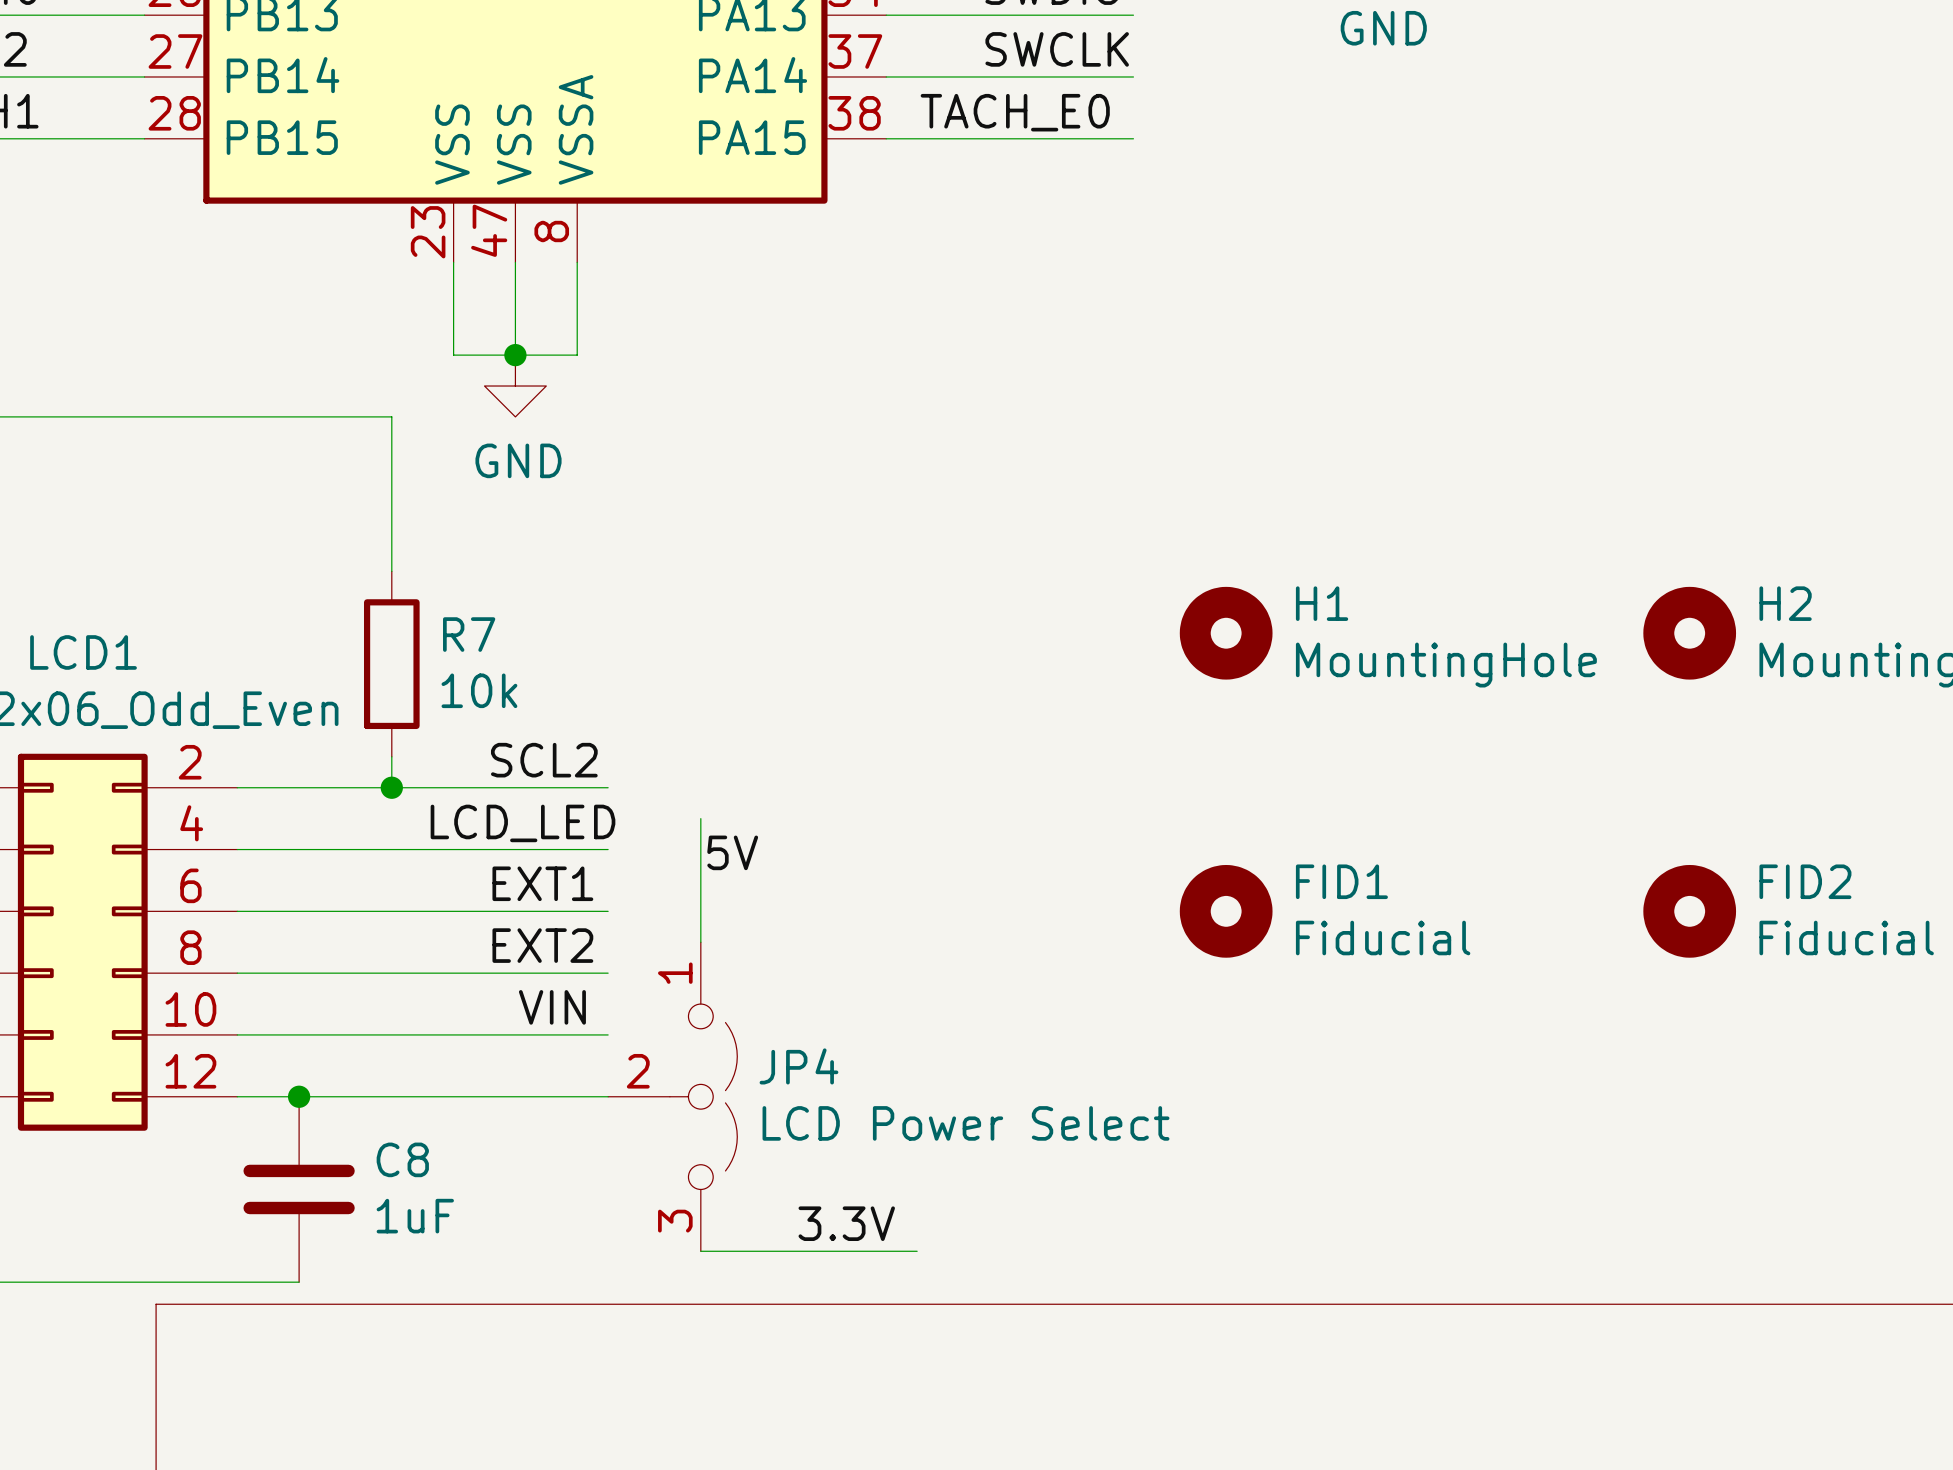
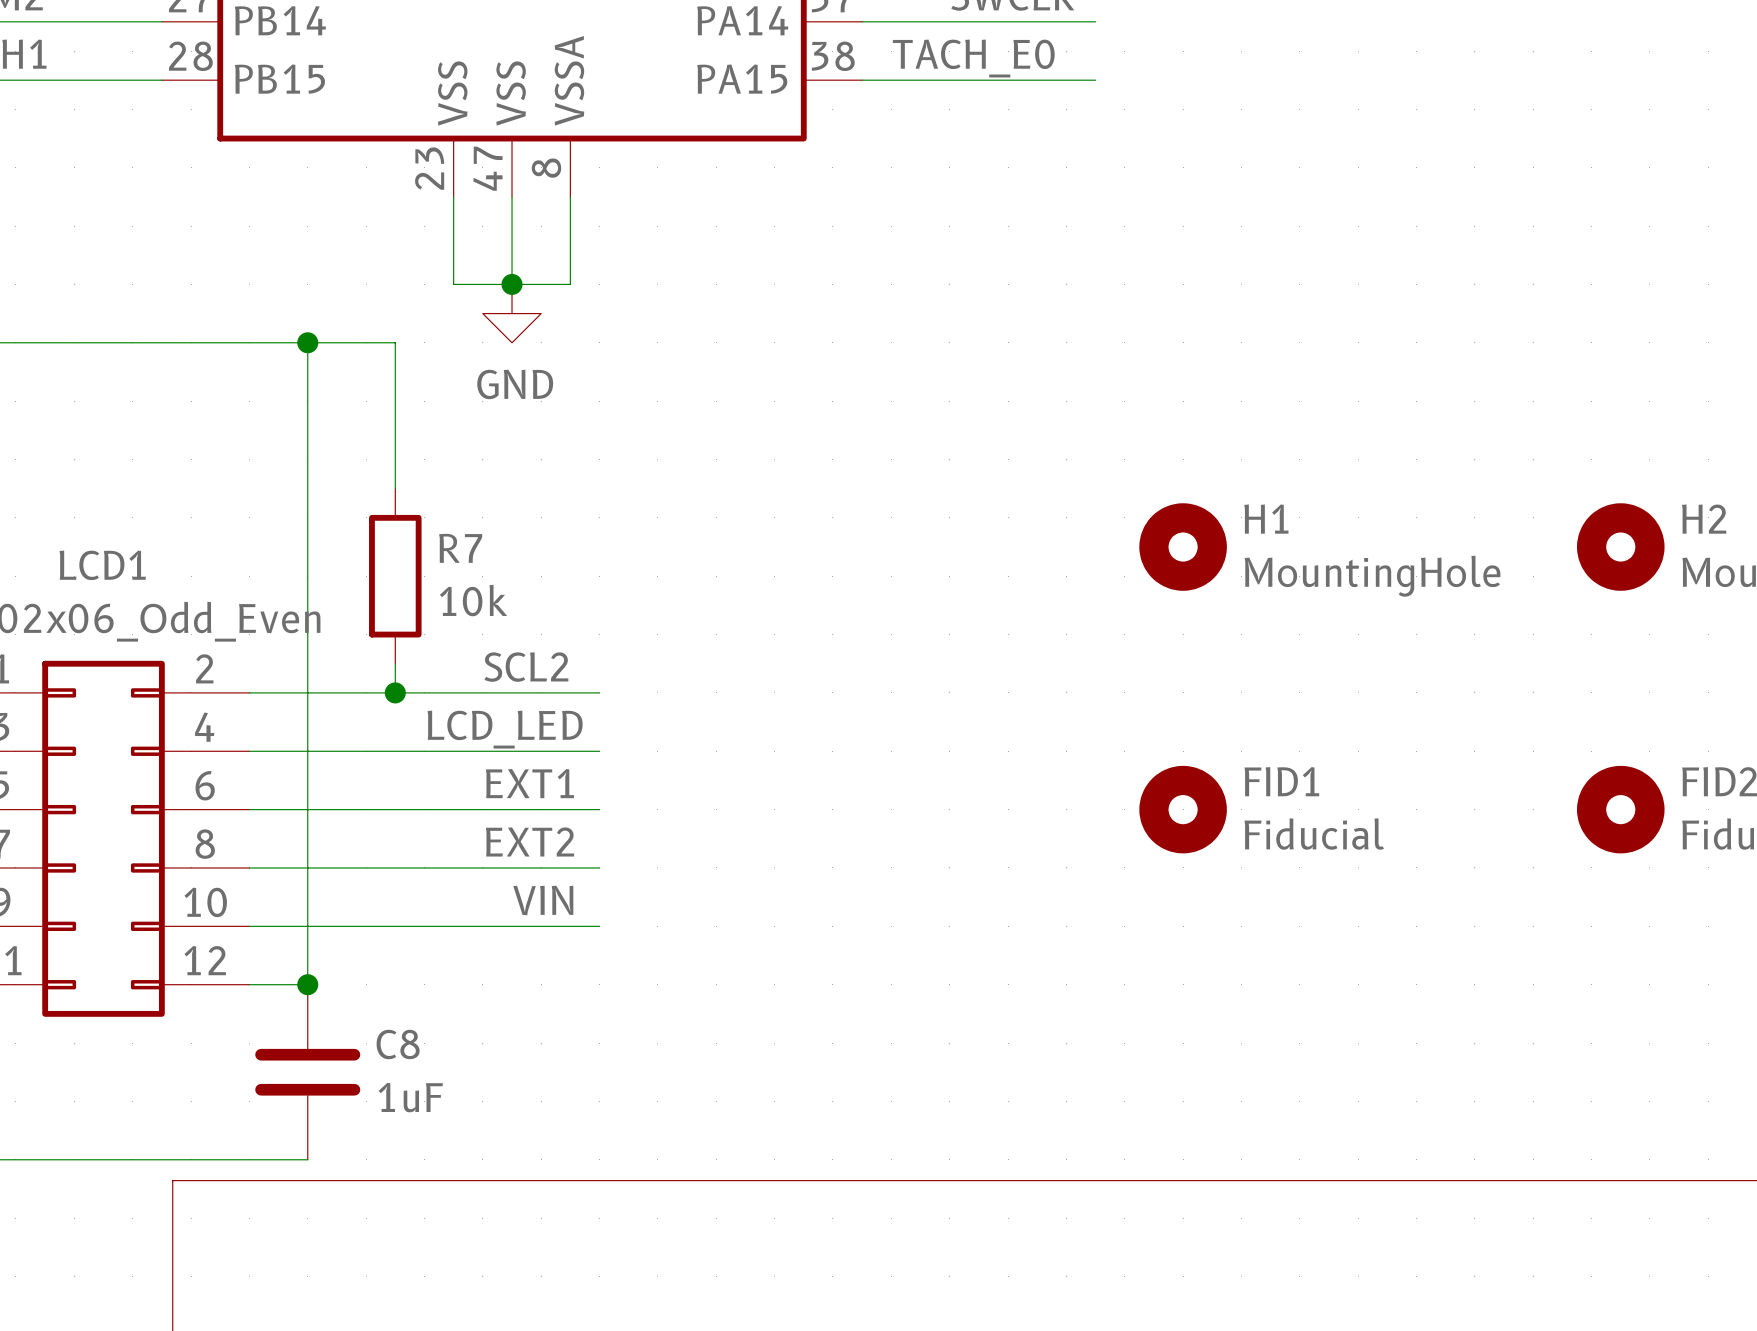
junction: none -> (307, 342)
wire: (700, 818) (700, 942) -> none
label: 5V (732, 852) -> none
wire: (299, 1096) (608, 1096) -> (307, 984) (307, 342)
JP4: LCD Power Select (672, 1096) -> none
label: 3.3V (846, 1223) -> none
wire: (700, 1251) (917, 1251) -> none

